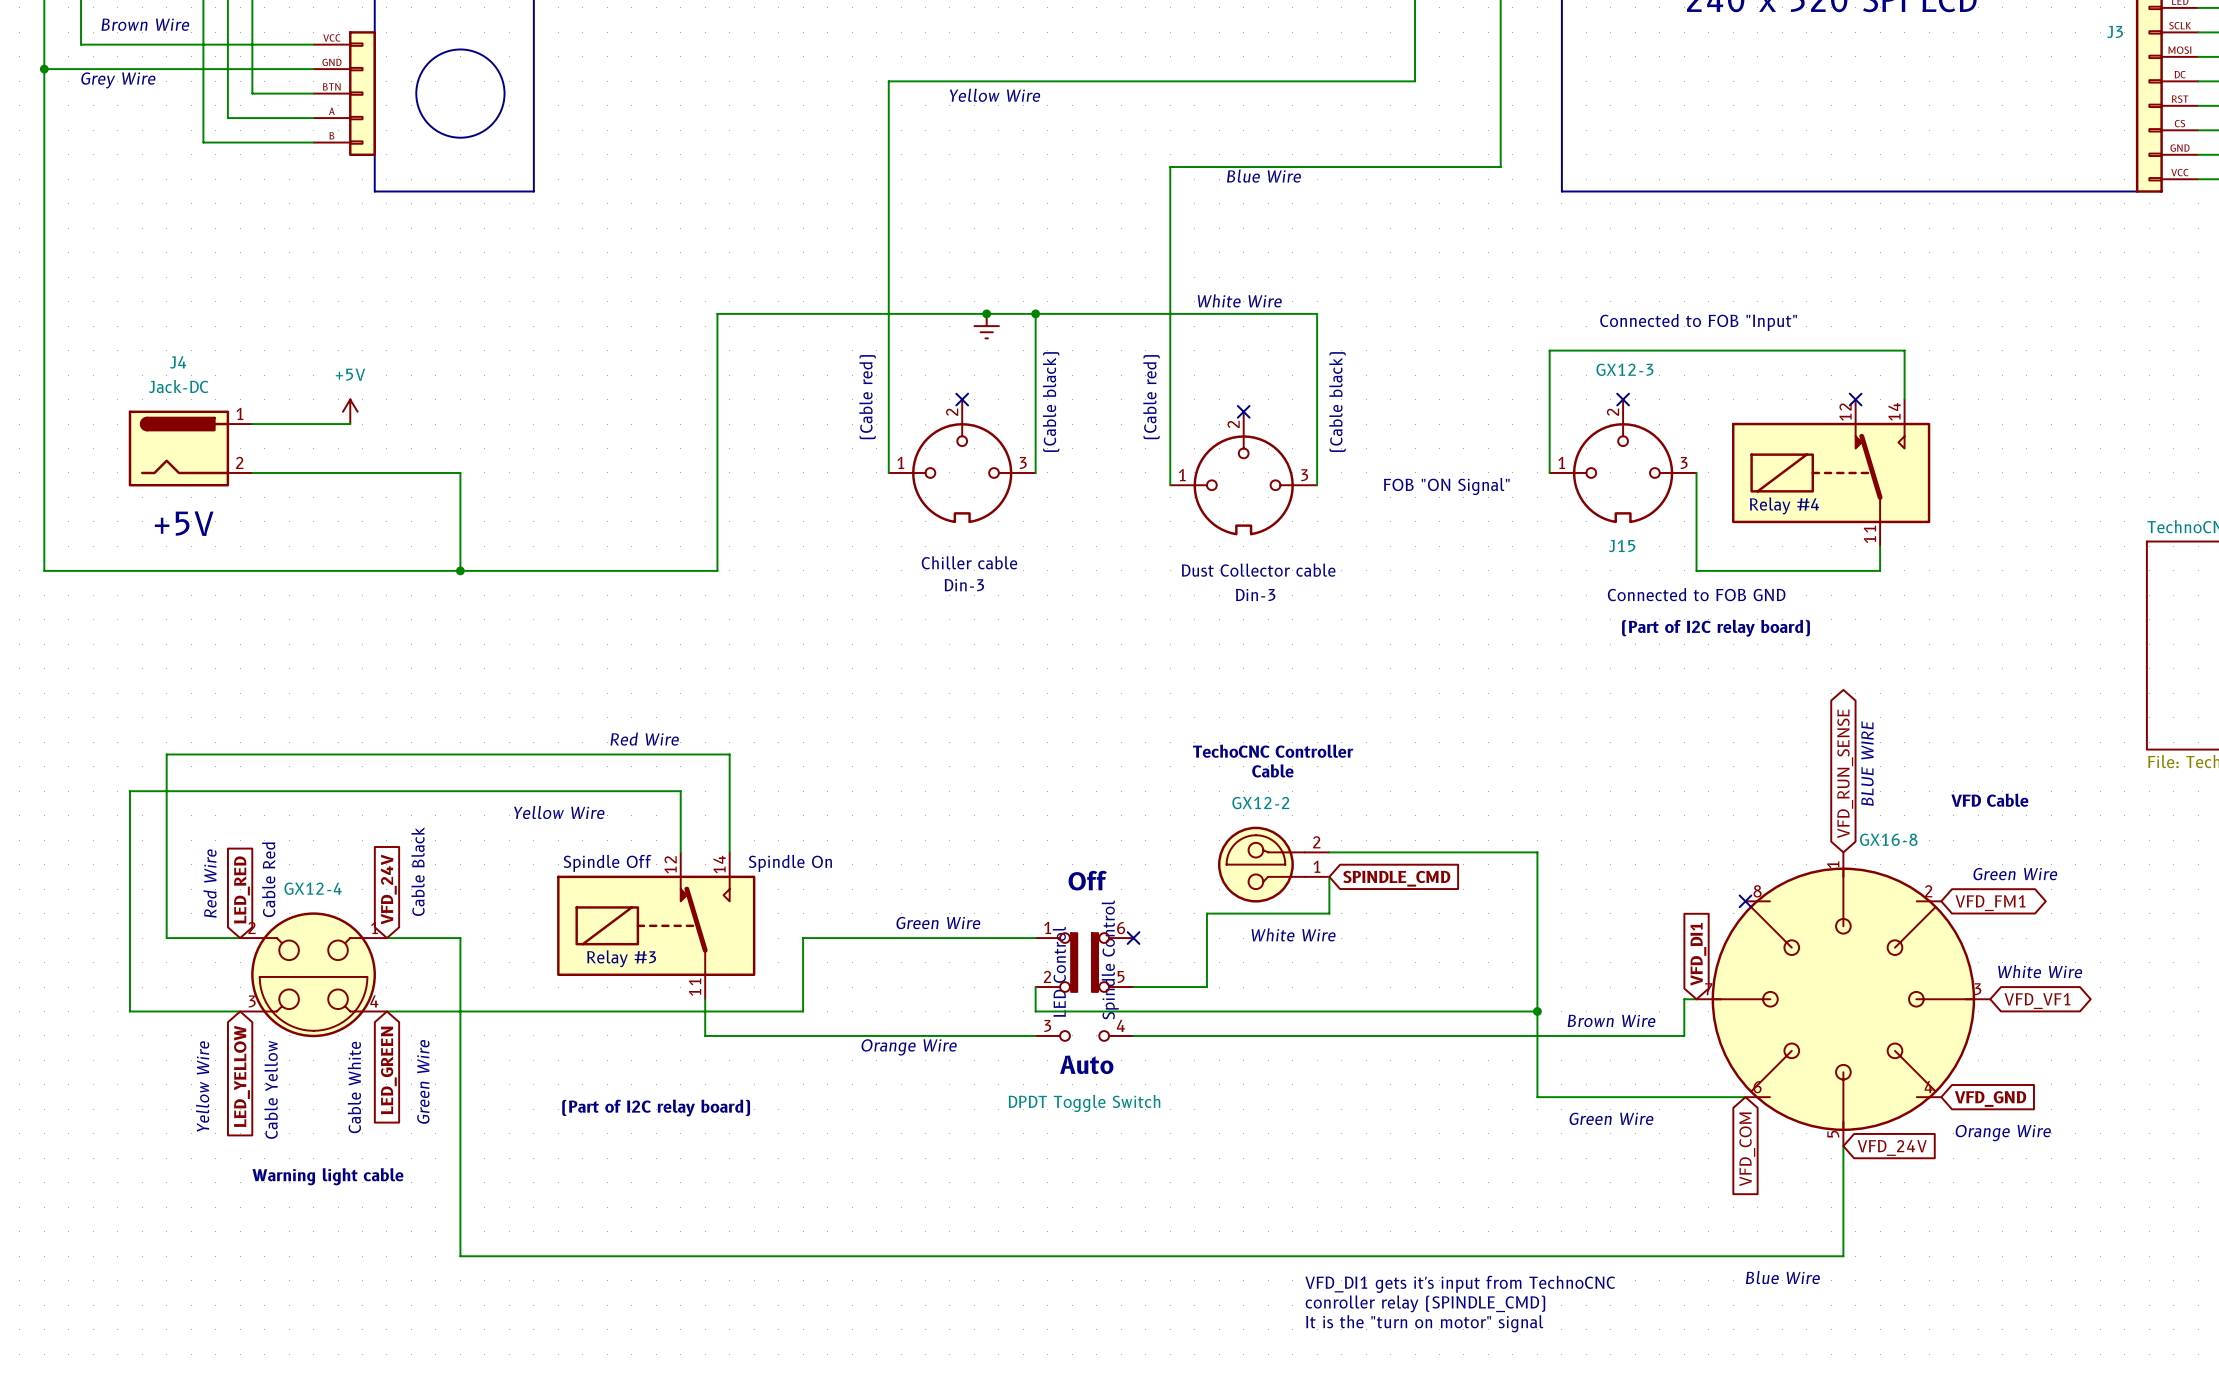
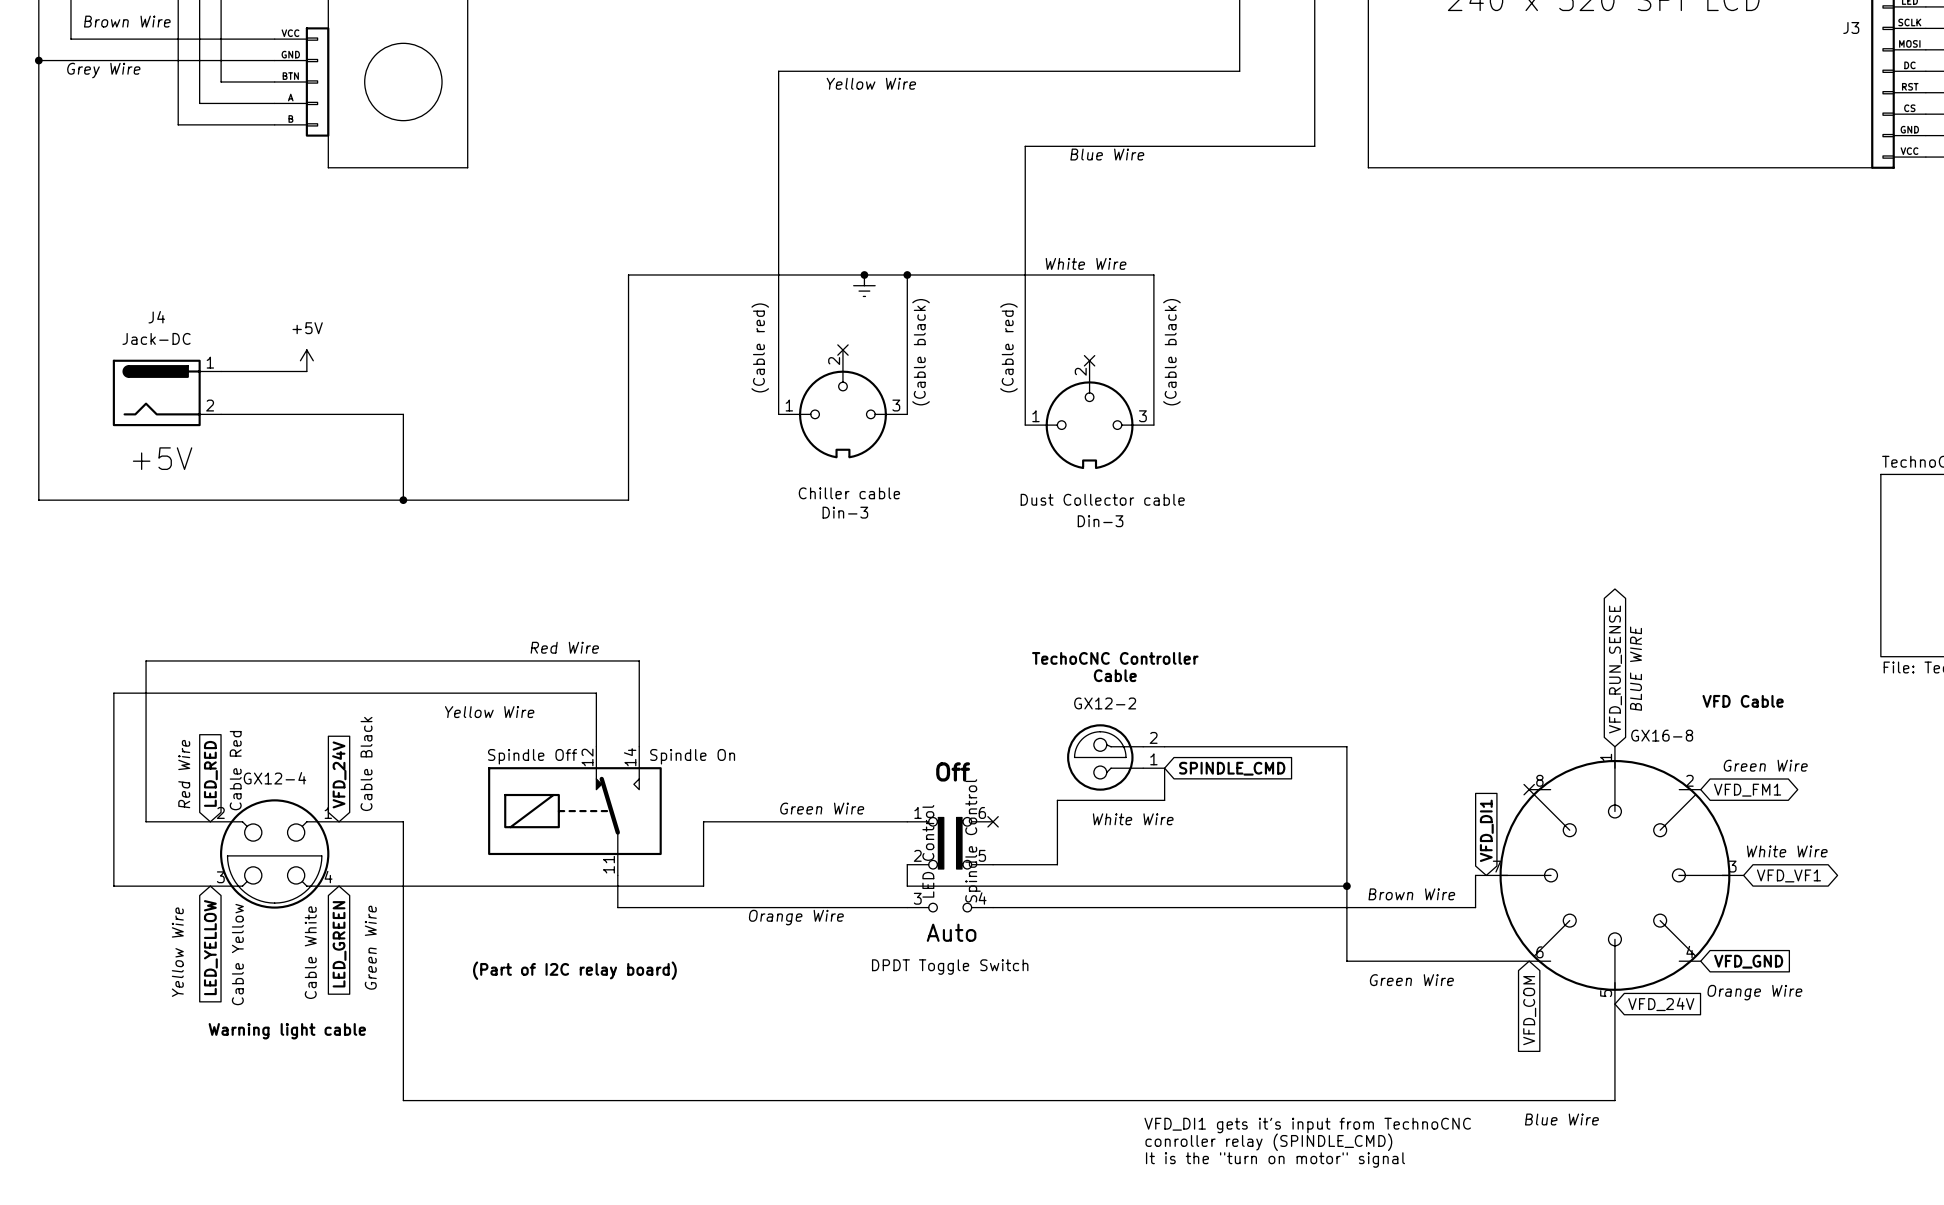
text: Connected to FOB "Input" (1698, 322) -> none
no-connect mark: (1623, 399) -> none
no-connect mark: (1855, 399) -> none
wire: (1904, 399) (1904, 350) (1549, 350) (1549, 472) -> none
J15: GX12-3 (1623, 461) -> none
wire: (1696, 472) (1696, 570) (1880, 570) (1880, 546) -> none
part: (1831, 472) -> none
text: FOB "ON Signal" (1446, 486) -> none
text: Relay #4 (1784, 505) -> none
text: Connected to FOB GND (1696, 594) -> none
text: (Part of I2C relay board) (1716, 628) -> none
text: Relay #3 (621, 958) -> none

